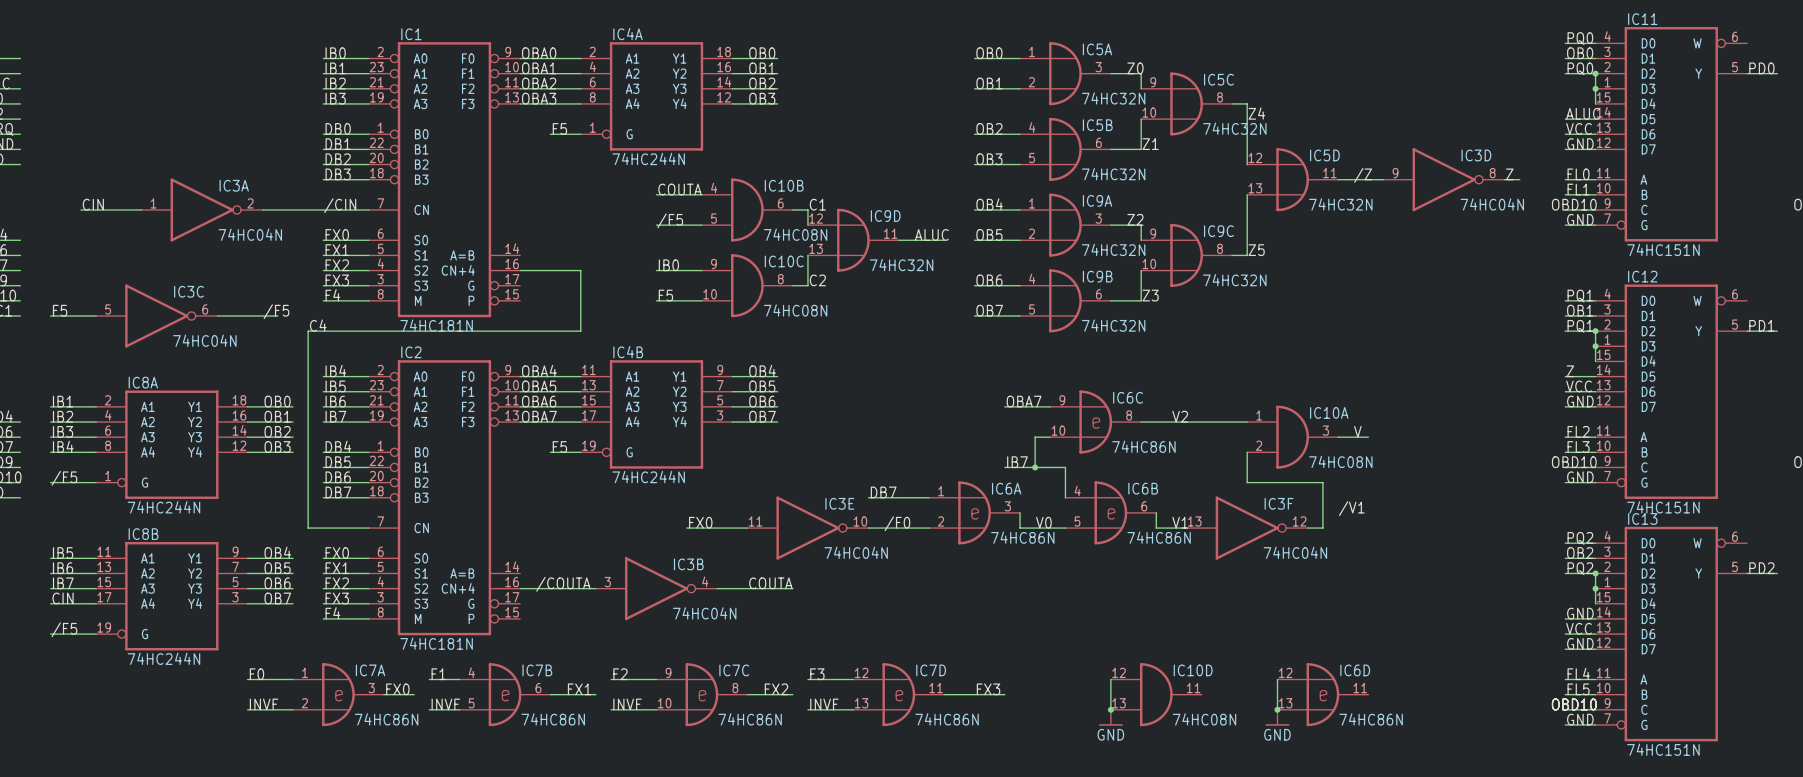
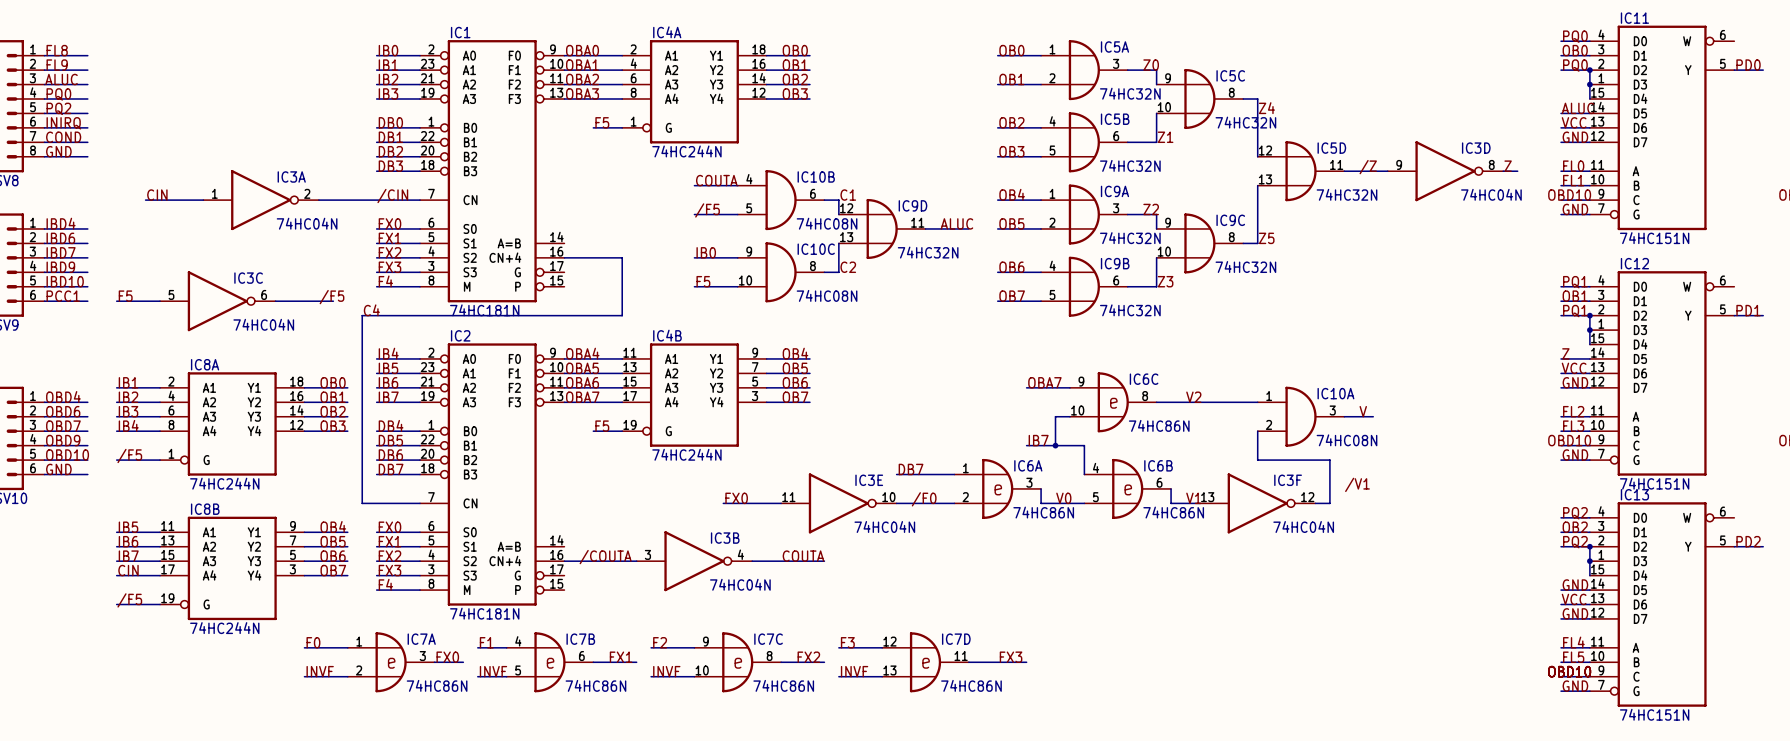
wire: (1110, 679) (1110, 709) -> none
wire: (1277, 679) (1277, 709) -> none
IC10D: 74HC08N (1156, 694) -> none
IC6D: 74HC86N (1322, 694) -> none
junction: (1110, 709) -> none
junction: (1277, 709) -> none
power symbol: GND (1110, 717) -> none
power symbol: GND (1277, 717) -> none

